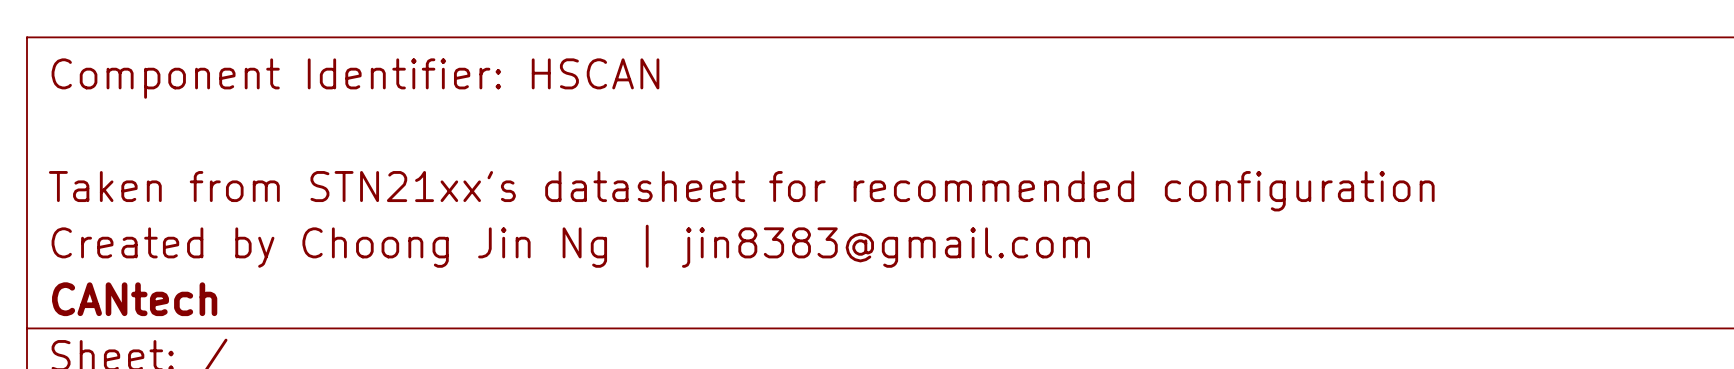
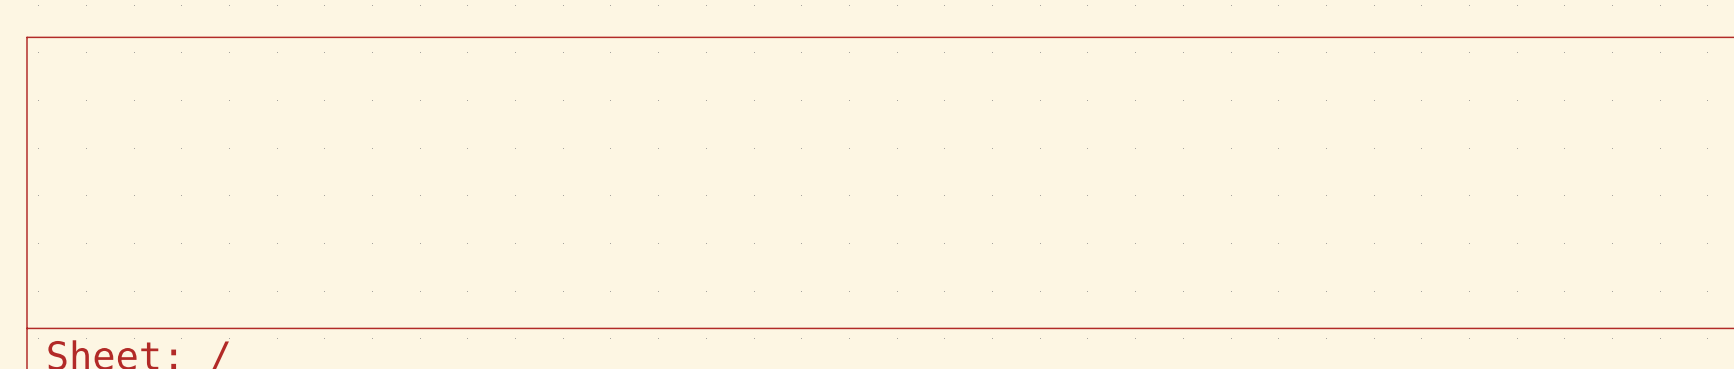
title block: Component Identifier: HSCAN (355, 78) -> none
title block: Taken from STN21xx's datasheet for recommended configuration (741, 191) -> none
title block: Created by Choong Jin Ng | jin8383@gmail.com (570, 246) -> none
title block: CANtech (134, 299) -> none

